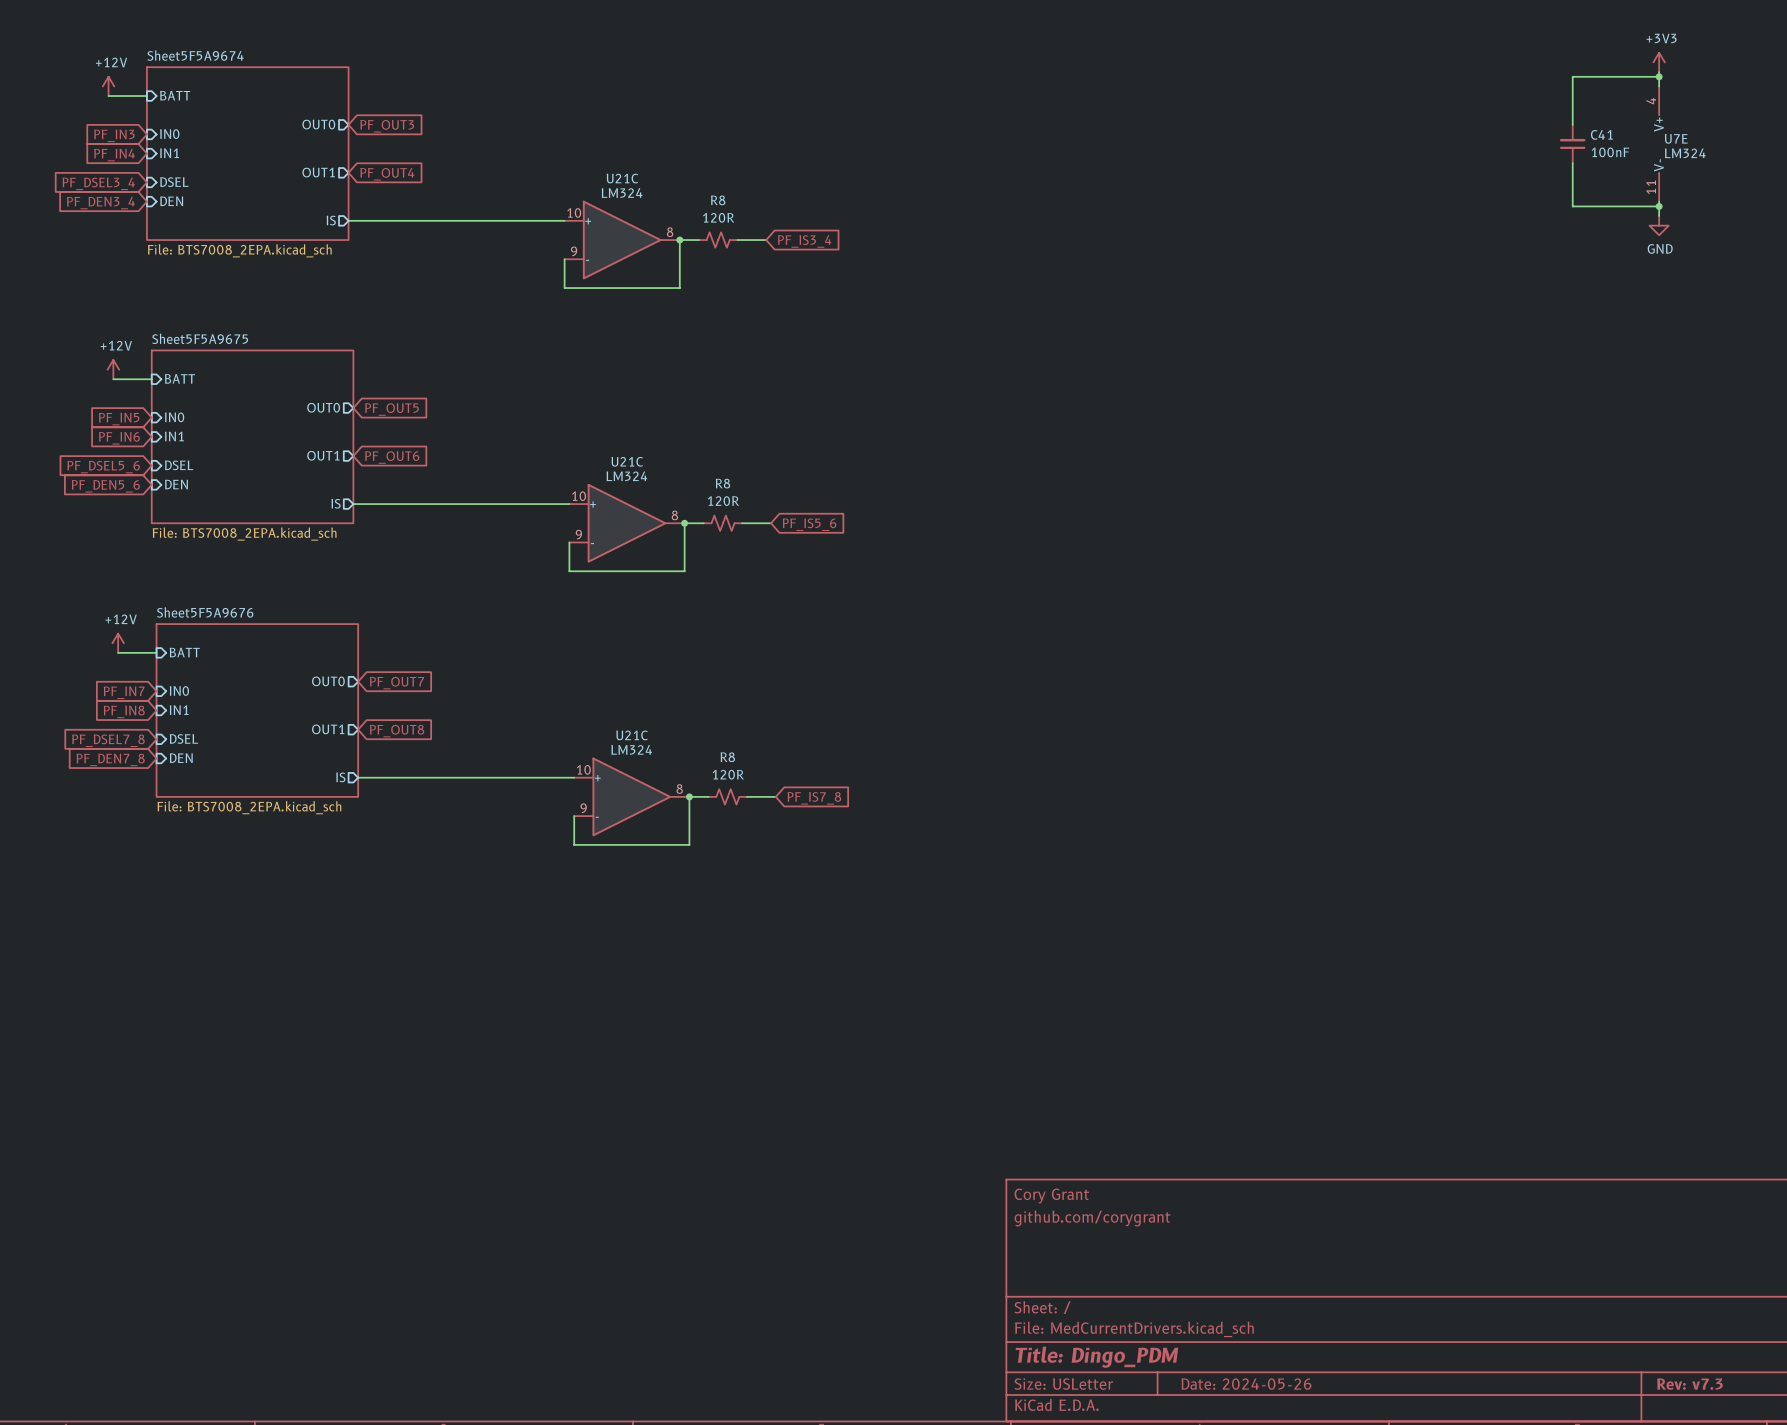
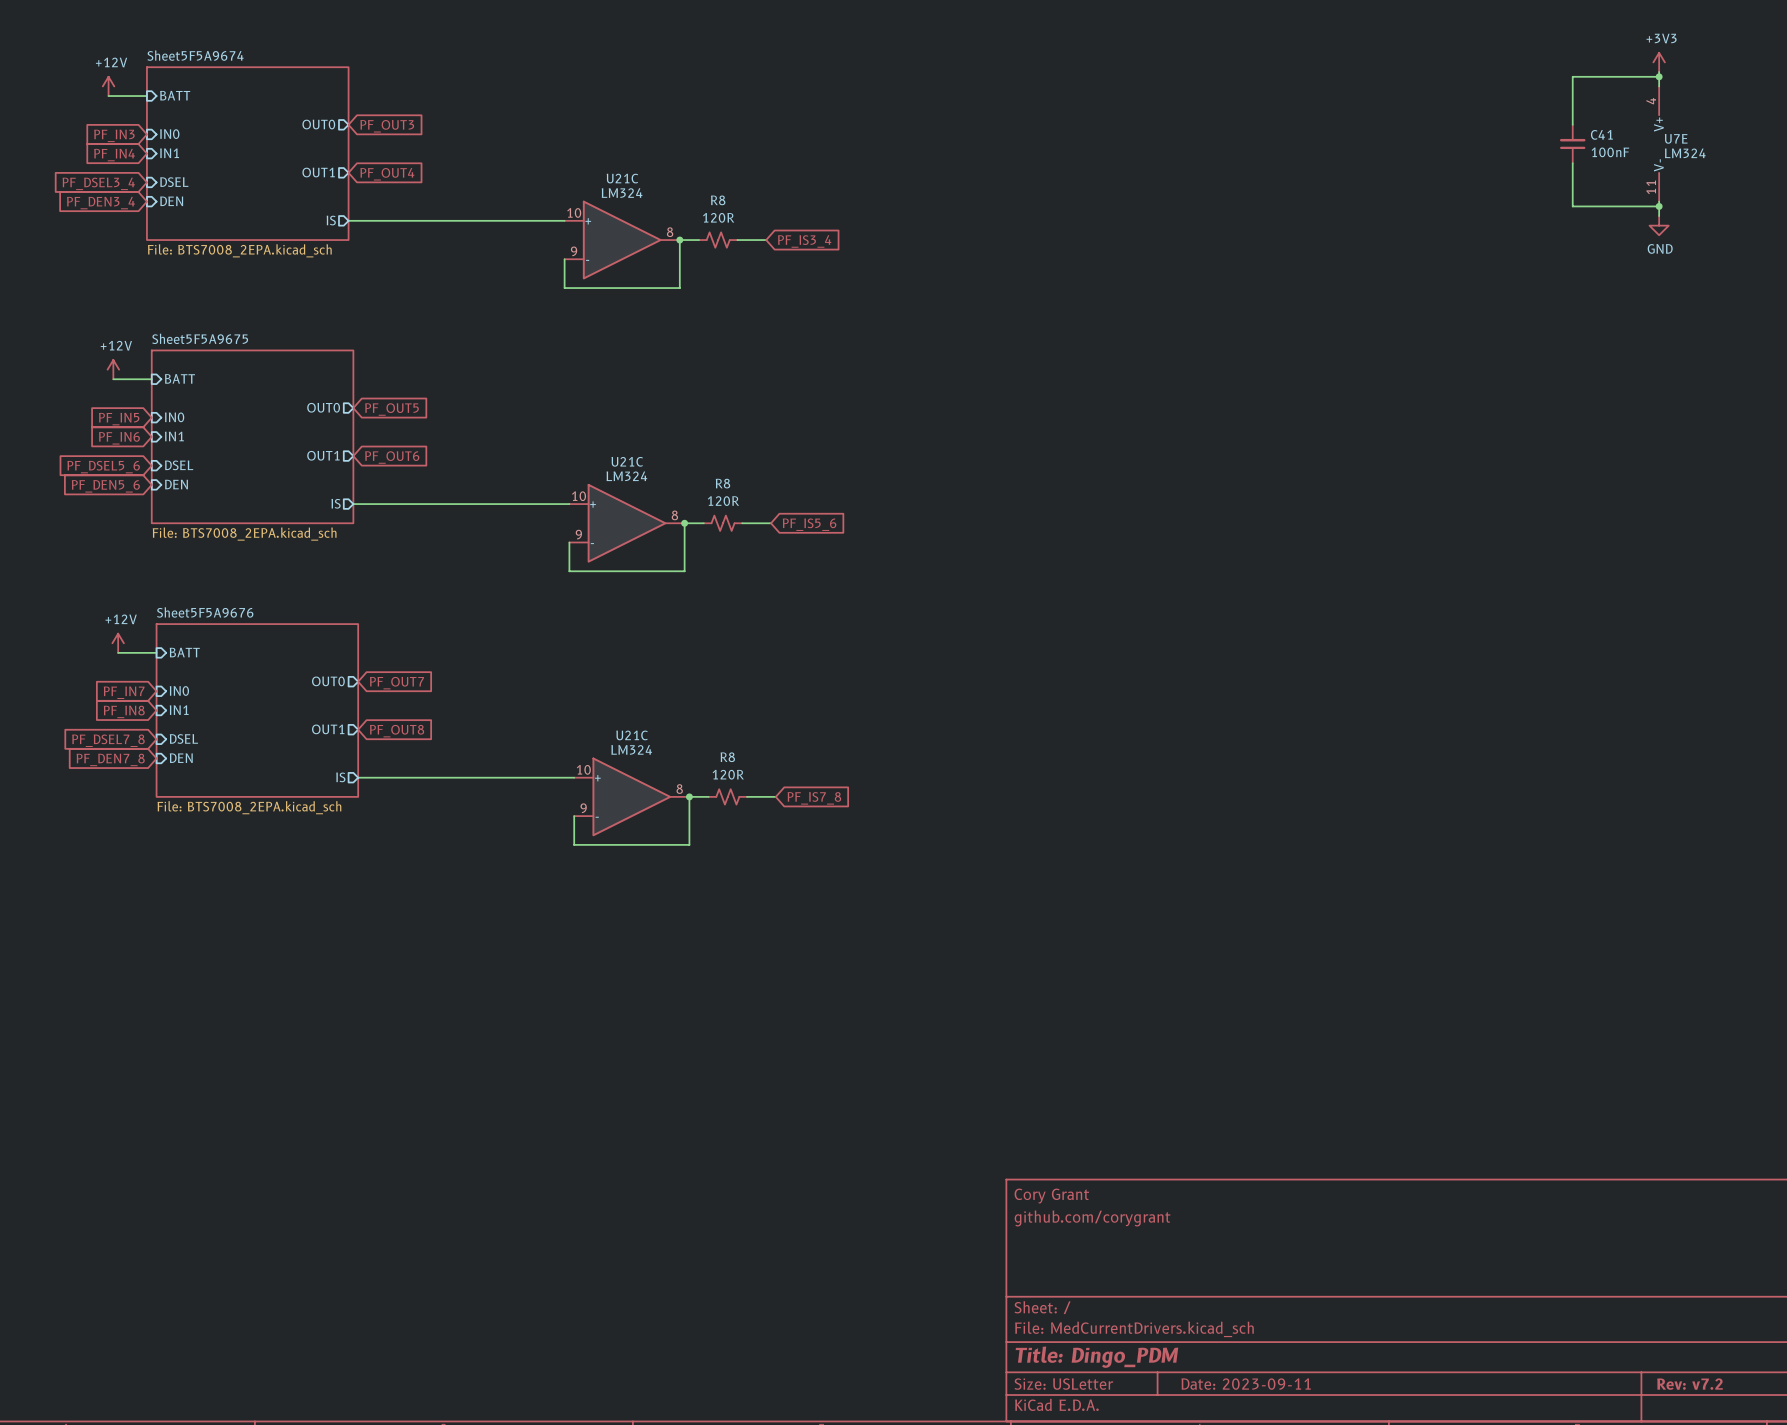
title block: Date: 2024-05-26 (1246, 1384) -> Date: 2023-09-11 (1246, 1384)
title block: Rev: v7.3 (1689, 1384) -> Rev: v7.2 (1689, 1384)

